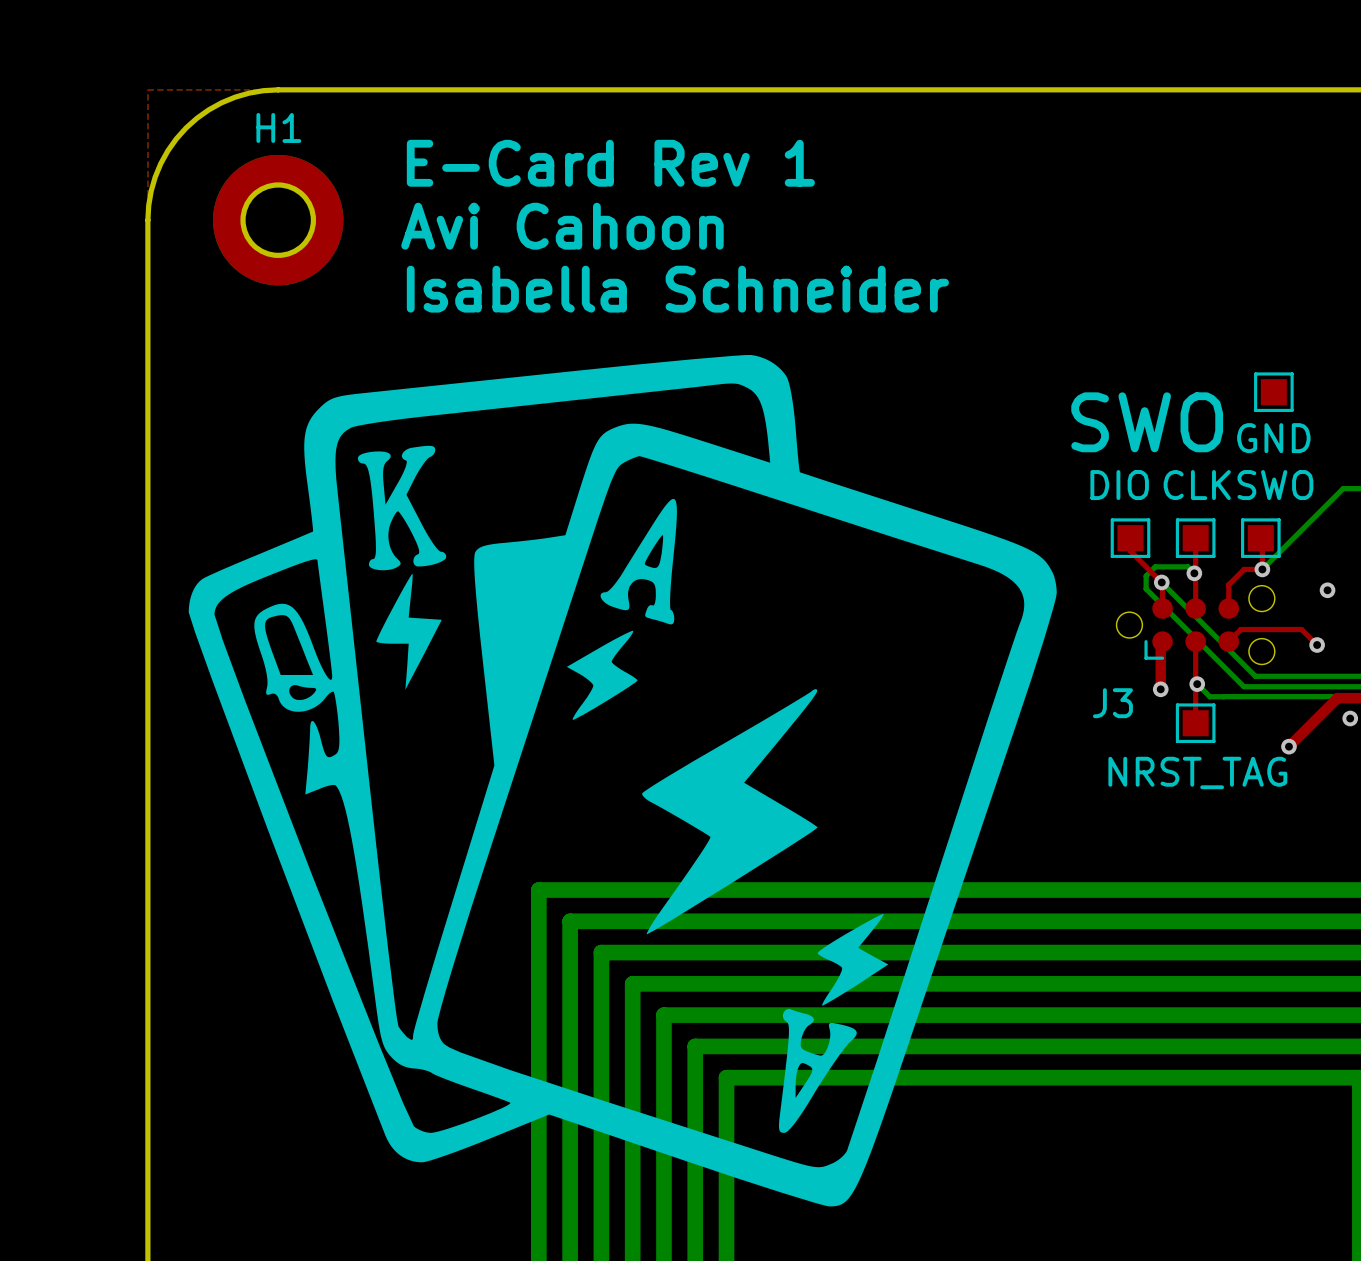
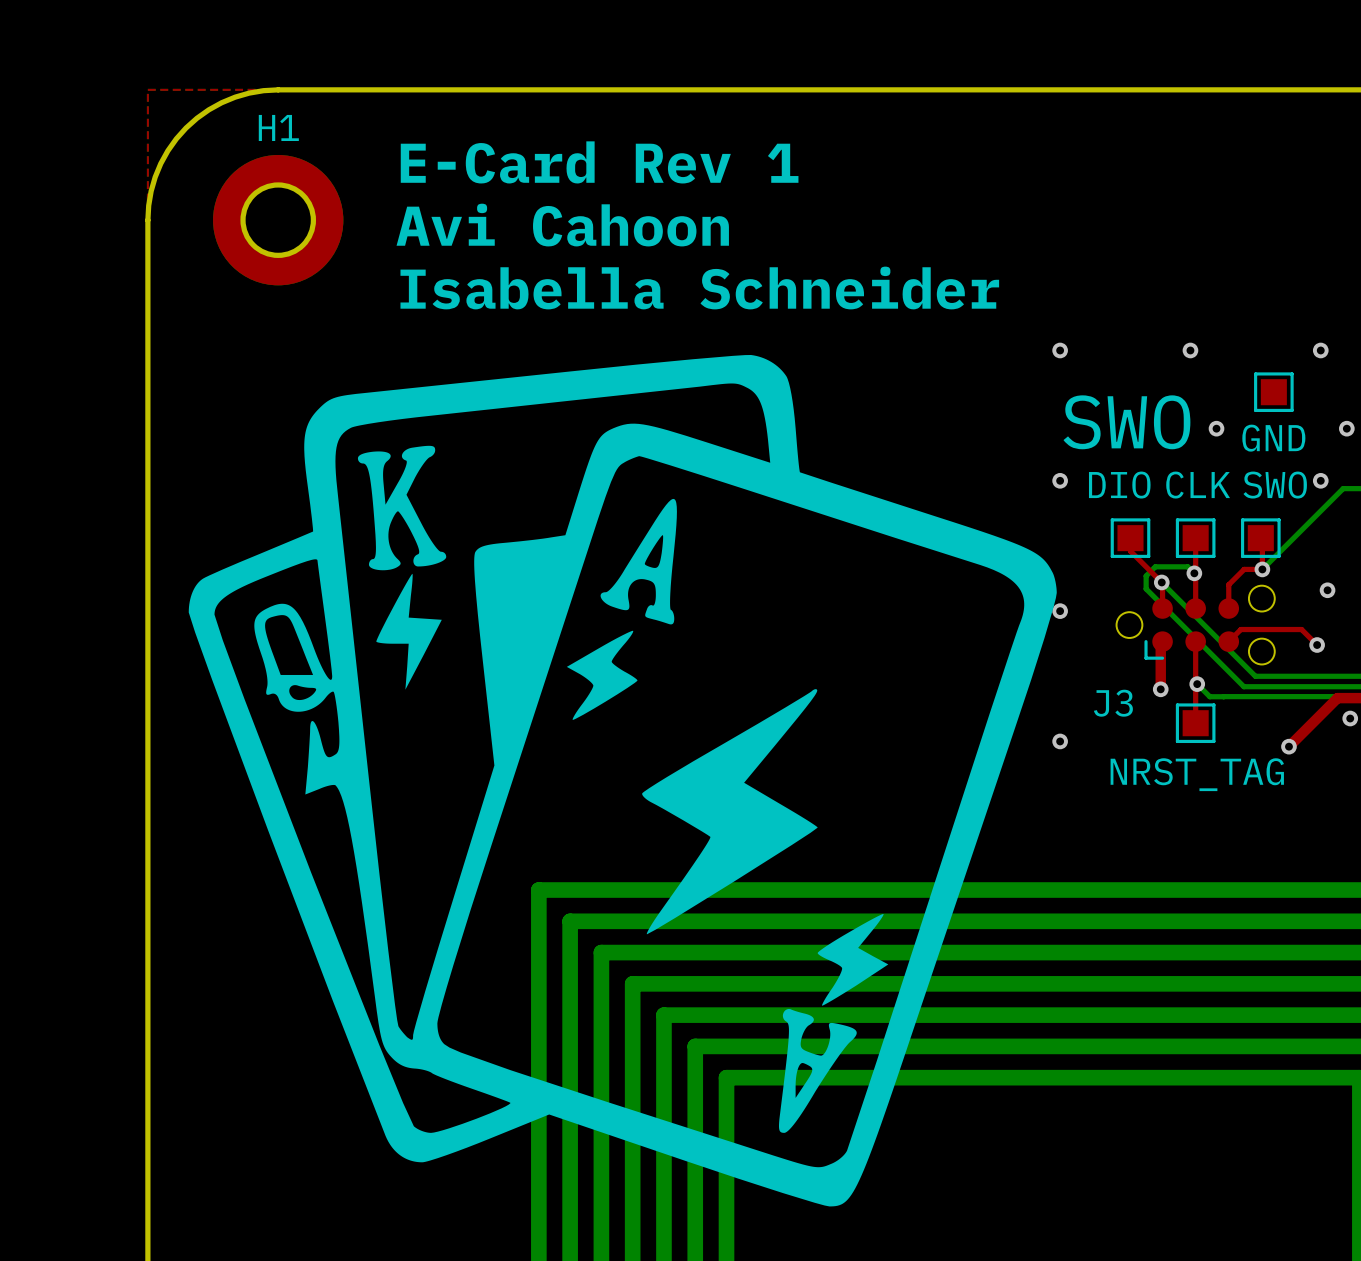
via: none -> (1060, 350)
via: none -> (1190, 350)
via: none -> (1320, 350)
via: none -> (1216, 428)
via: none -> (1346, 428)
via: none -> (1060, 480)
via: none -> (1320, 480)
via: none -> (1060, 611)
via: none -> (1060, 741)

